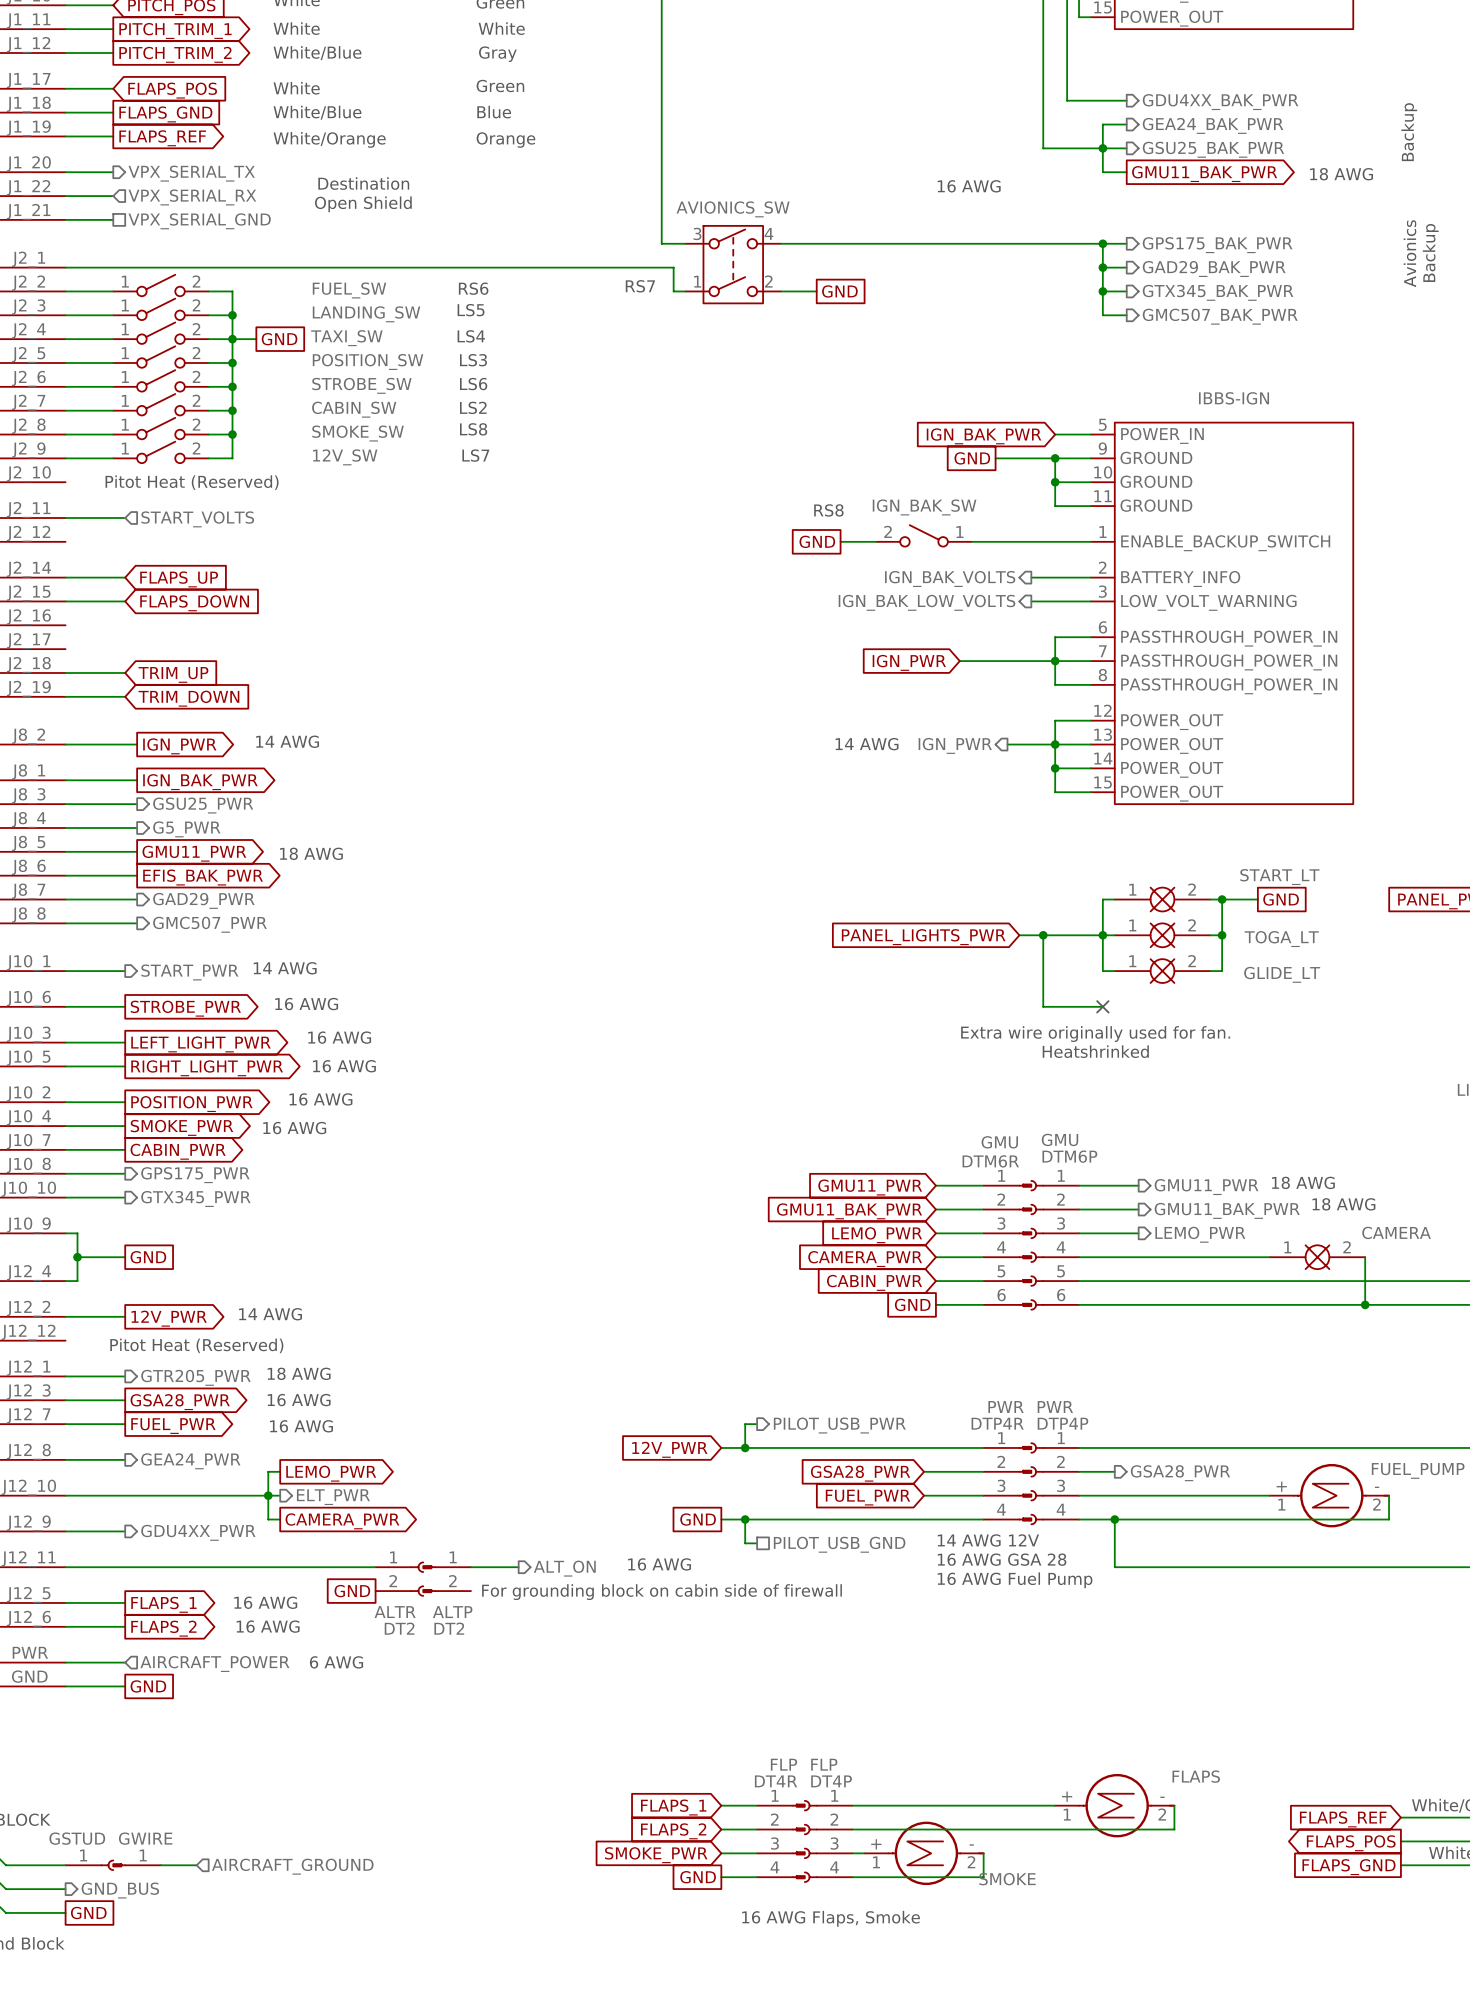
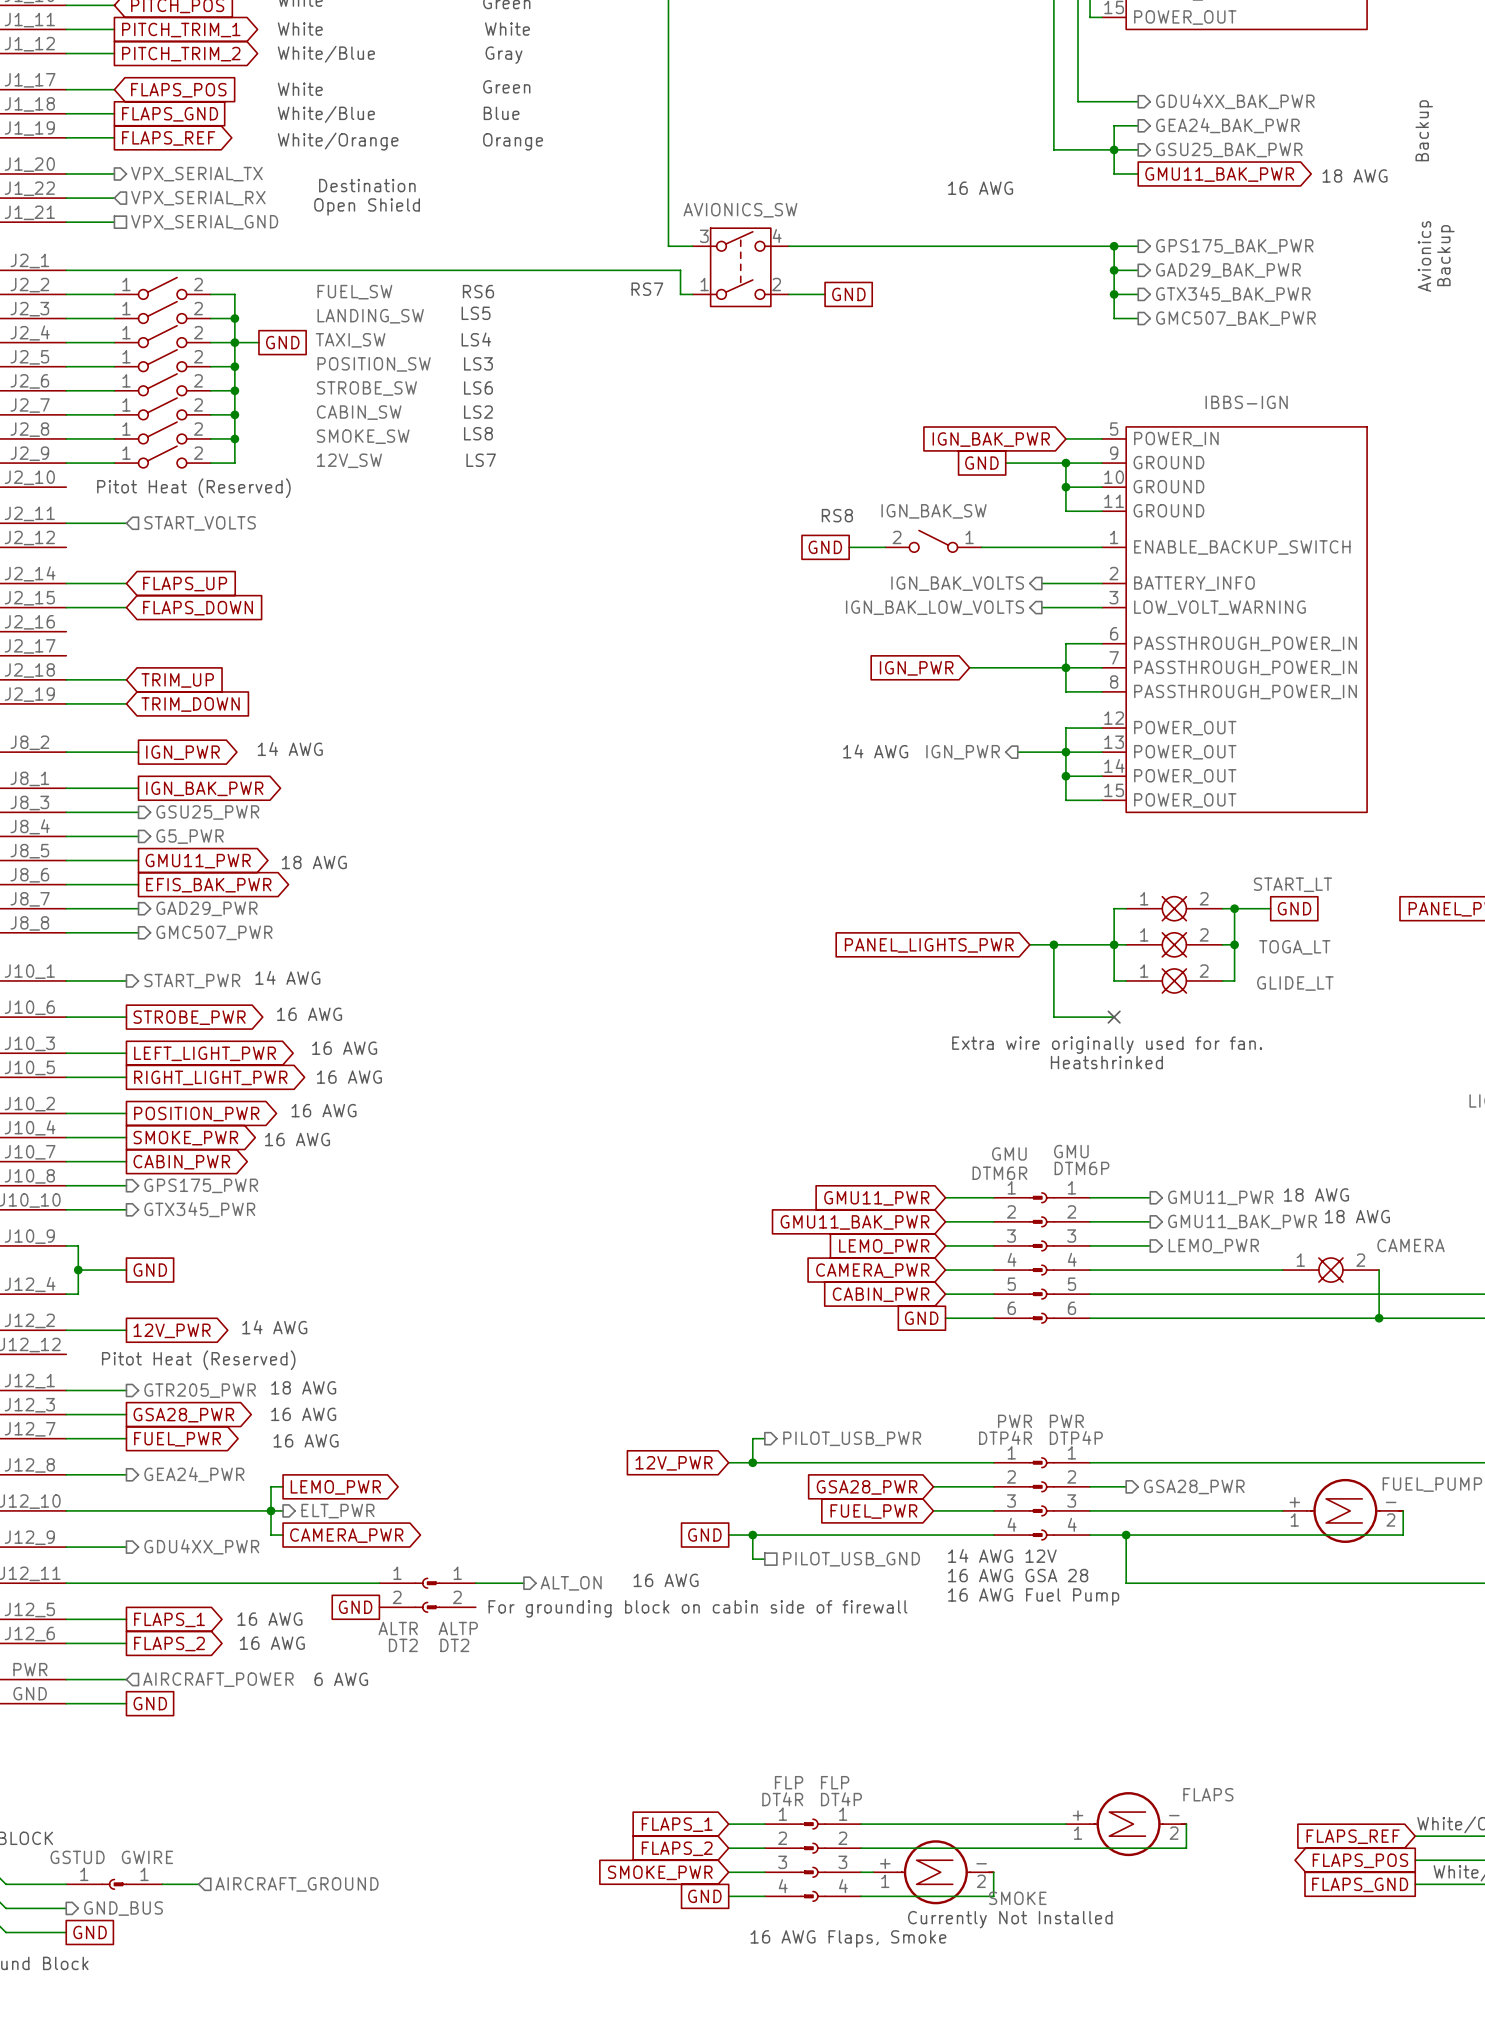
text: none -> Currently Not Installed (1010, 1919)

